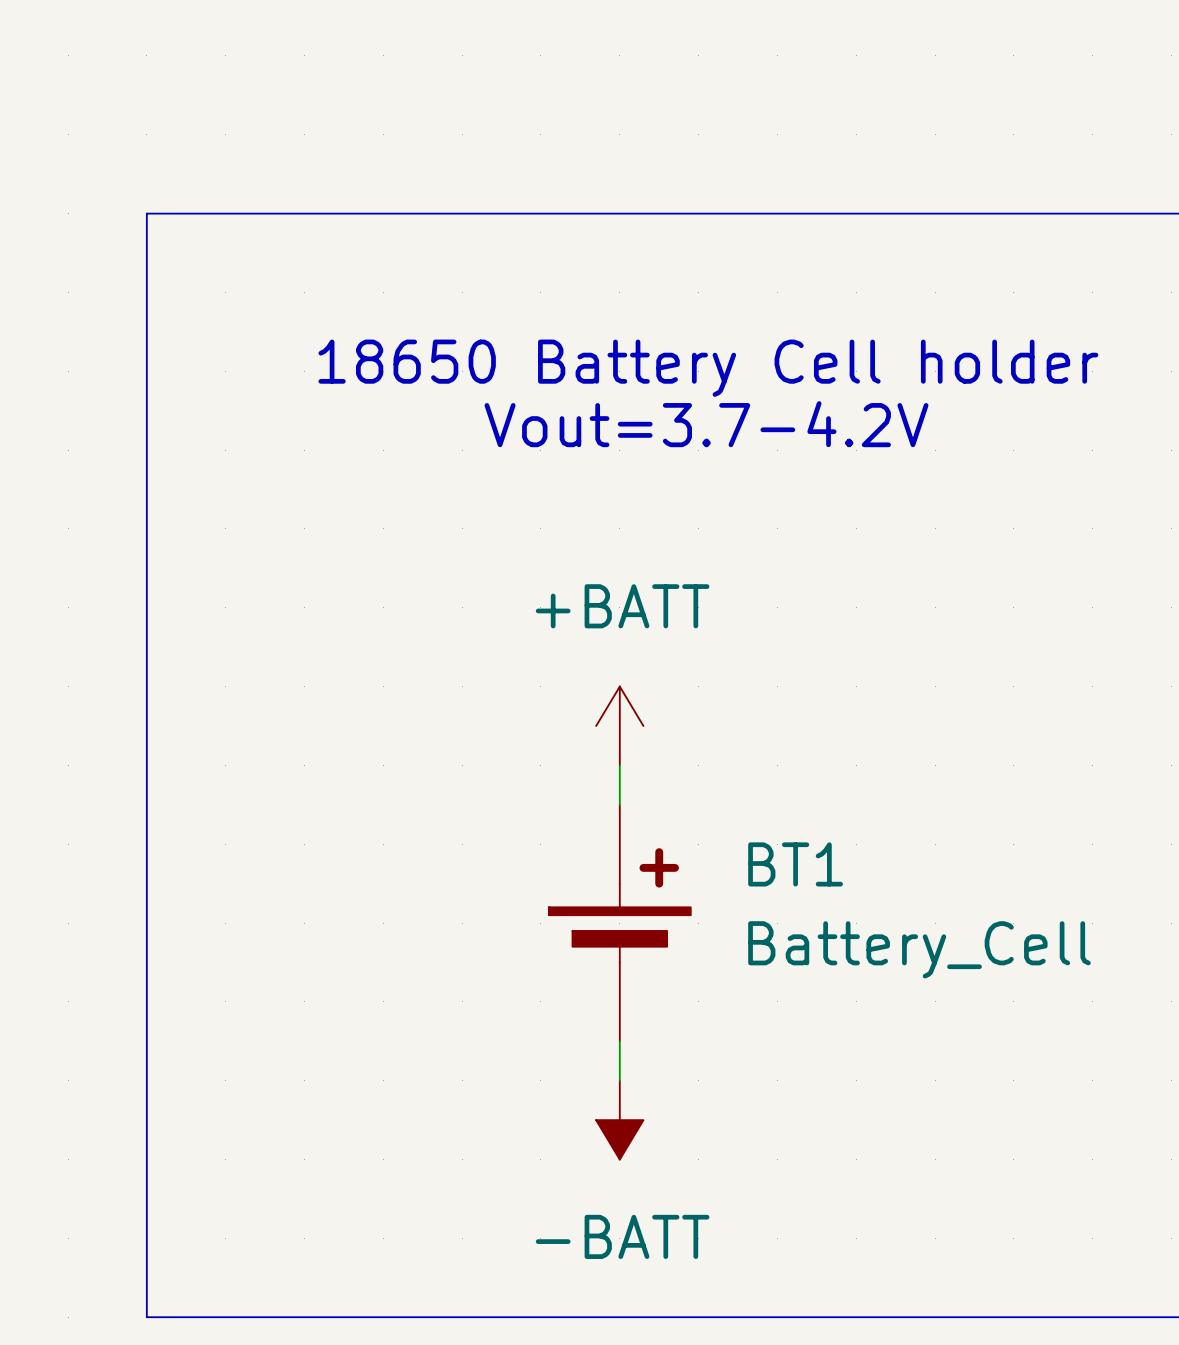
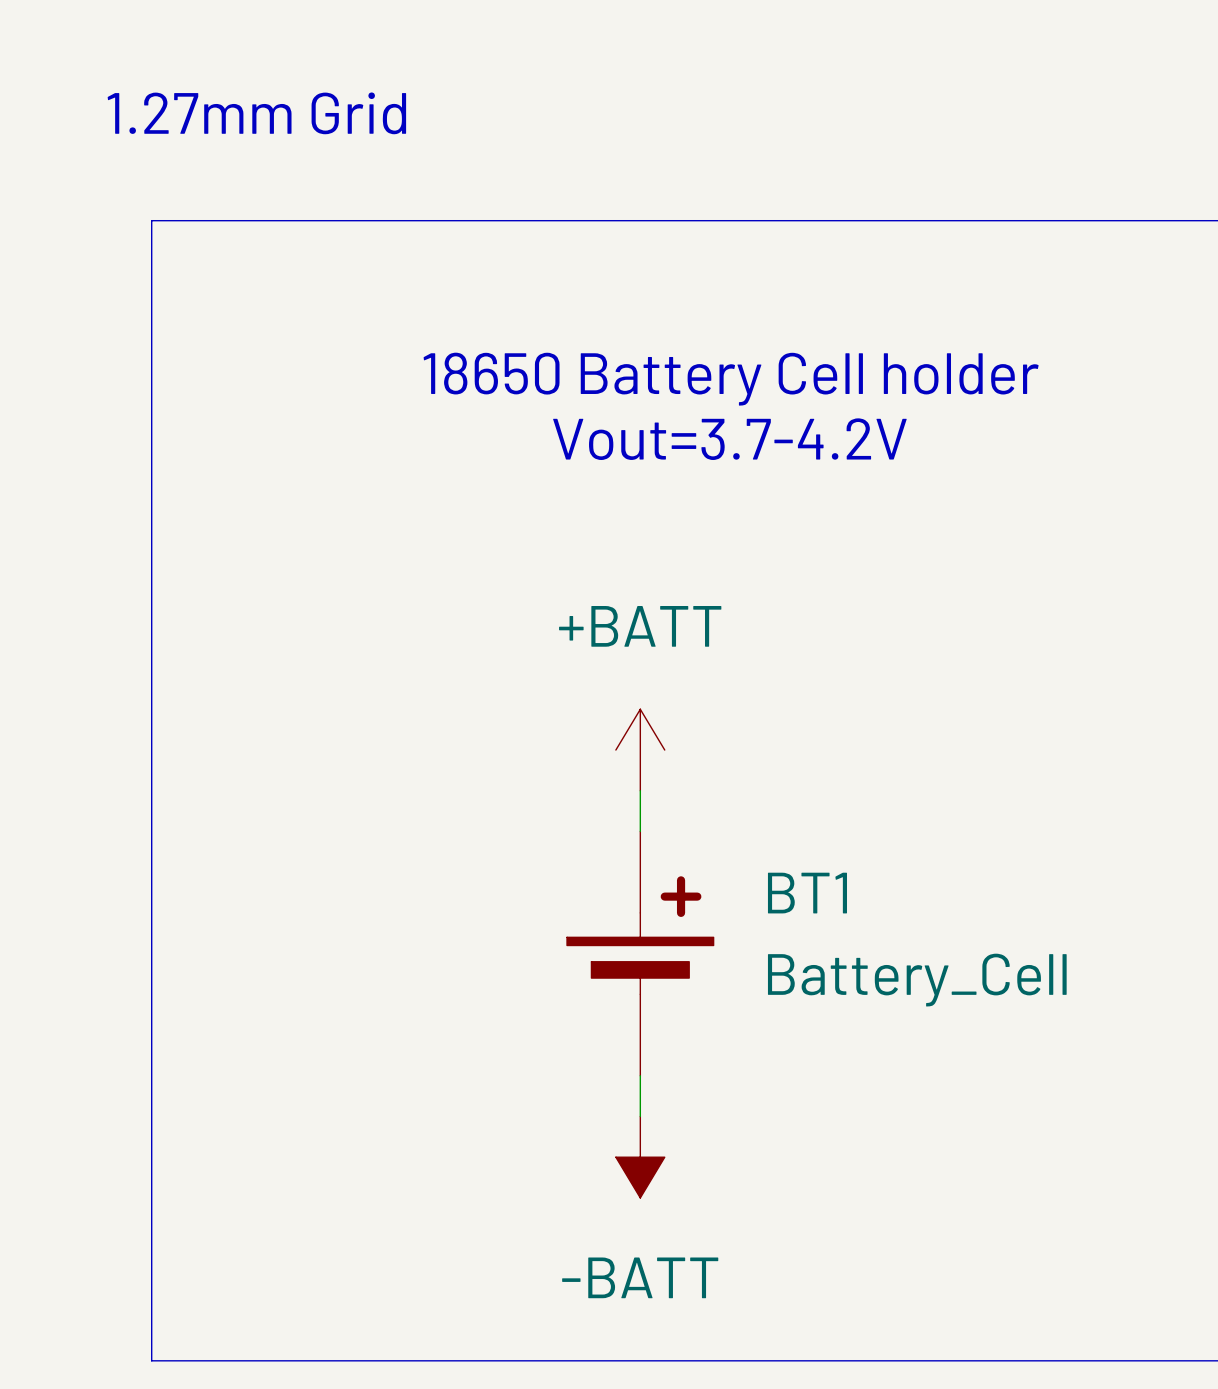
text: none -> 1.27mm Grid (256, 113)

